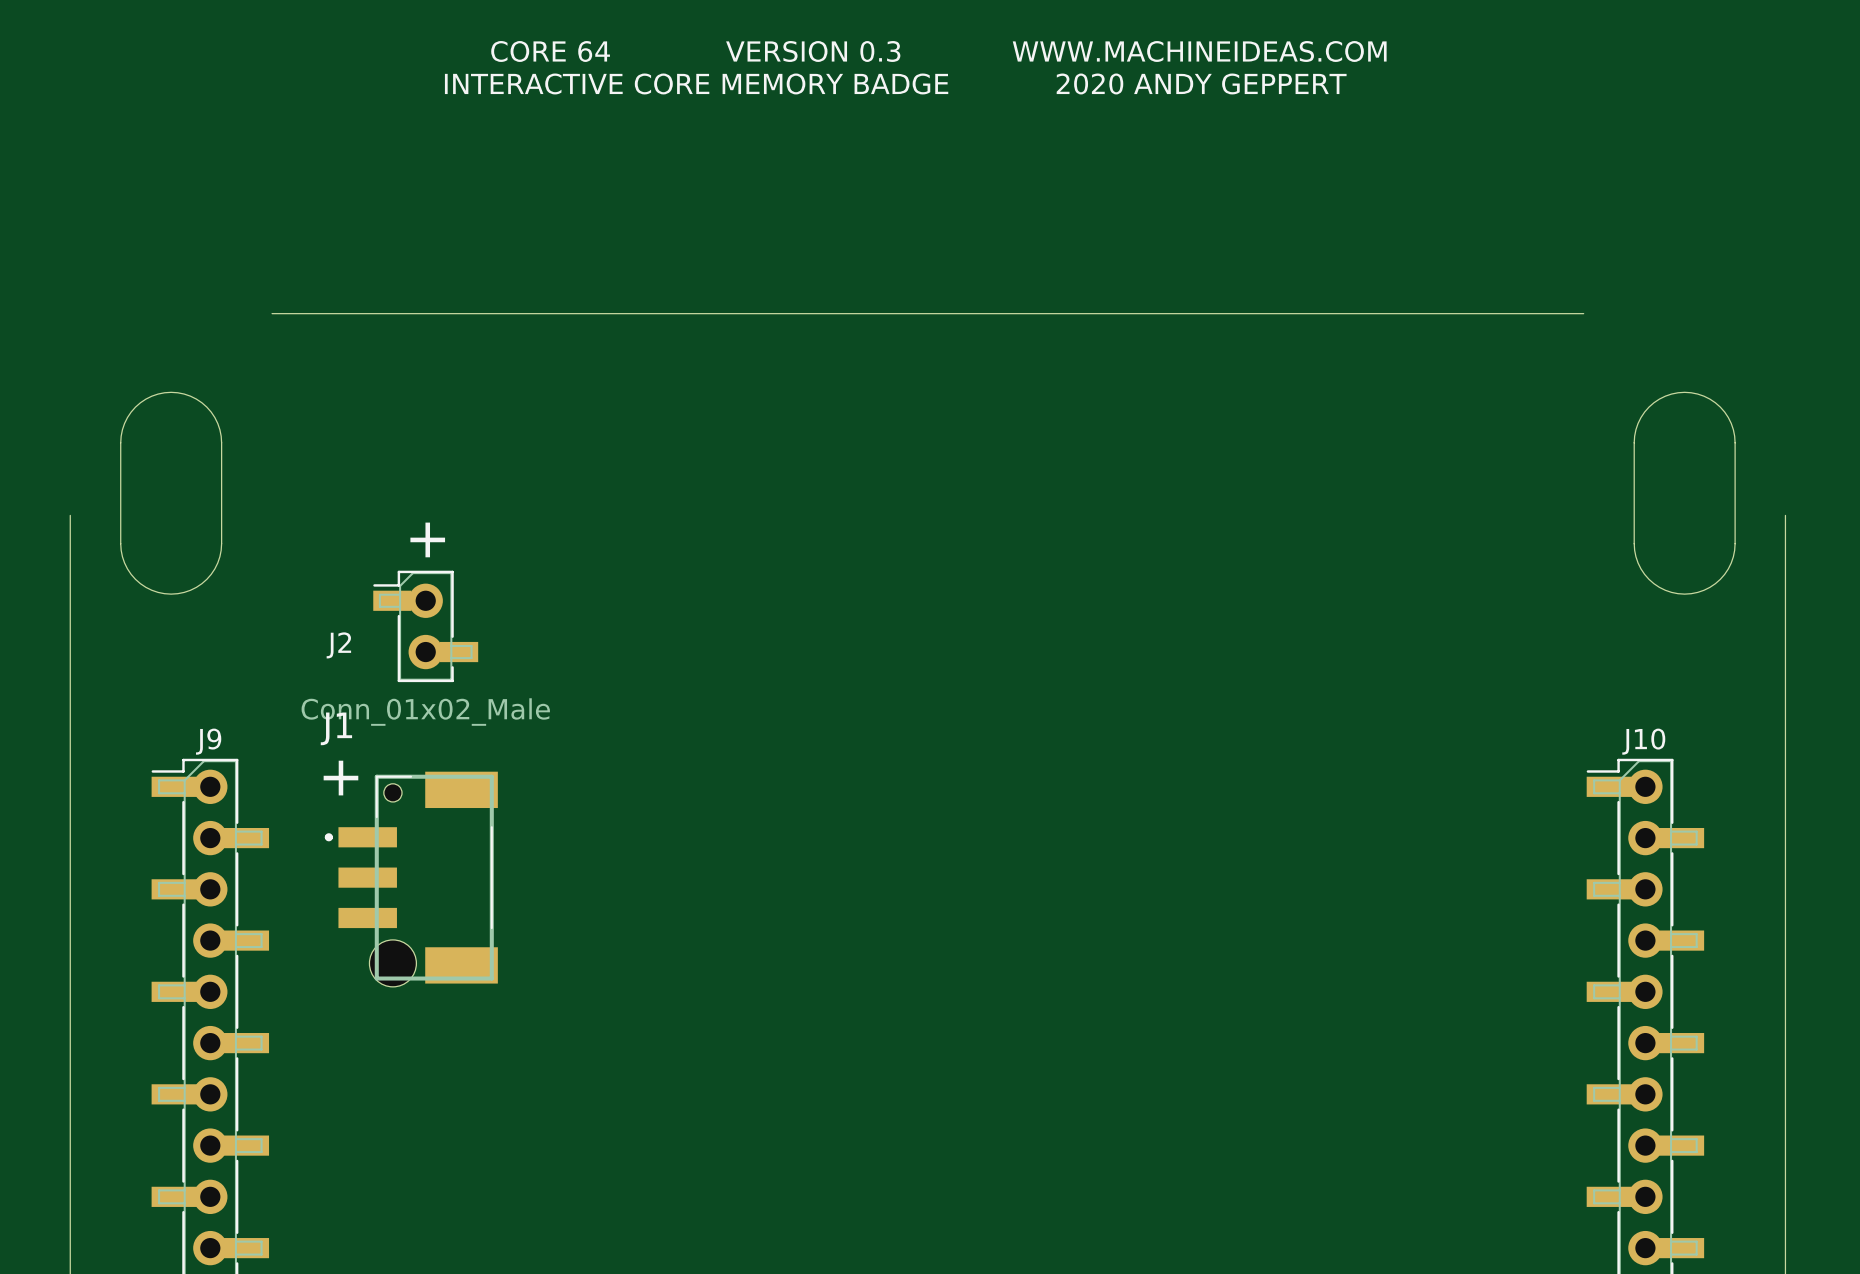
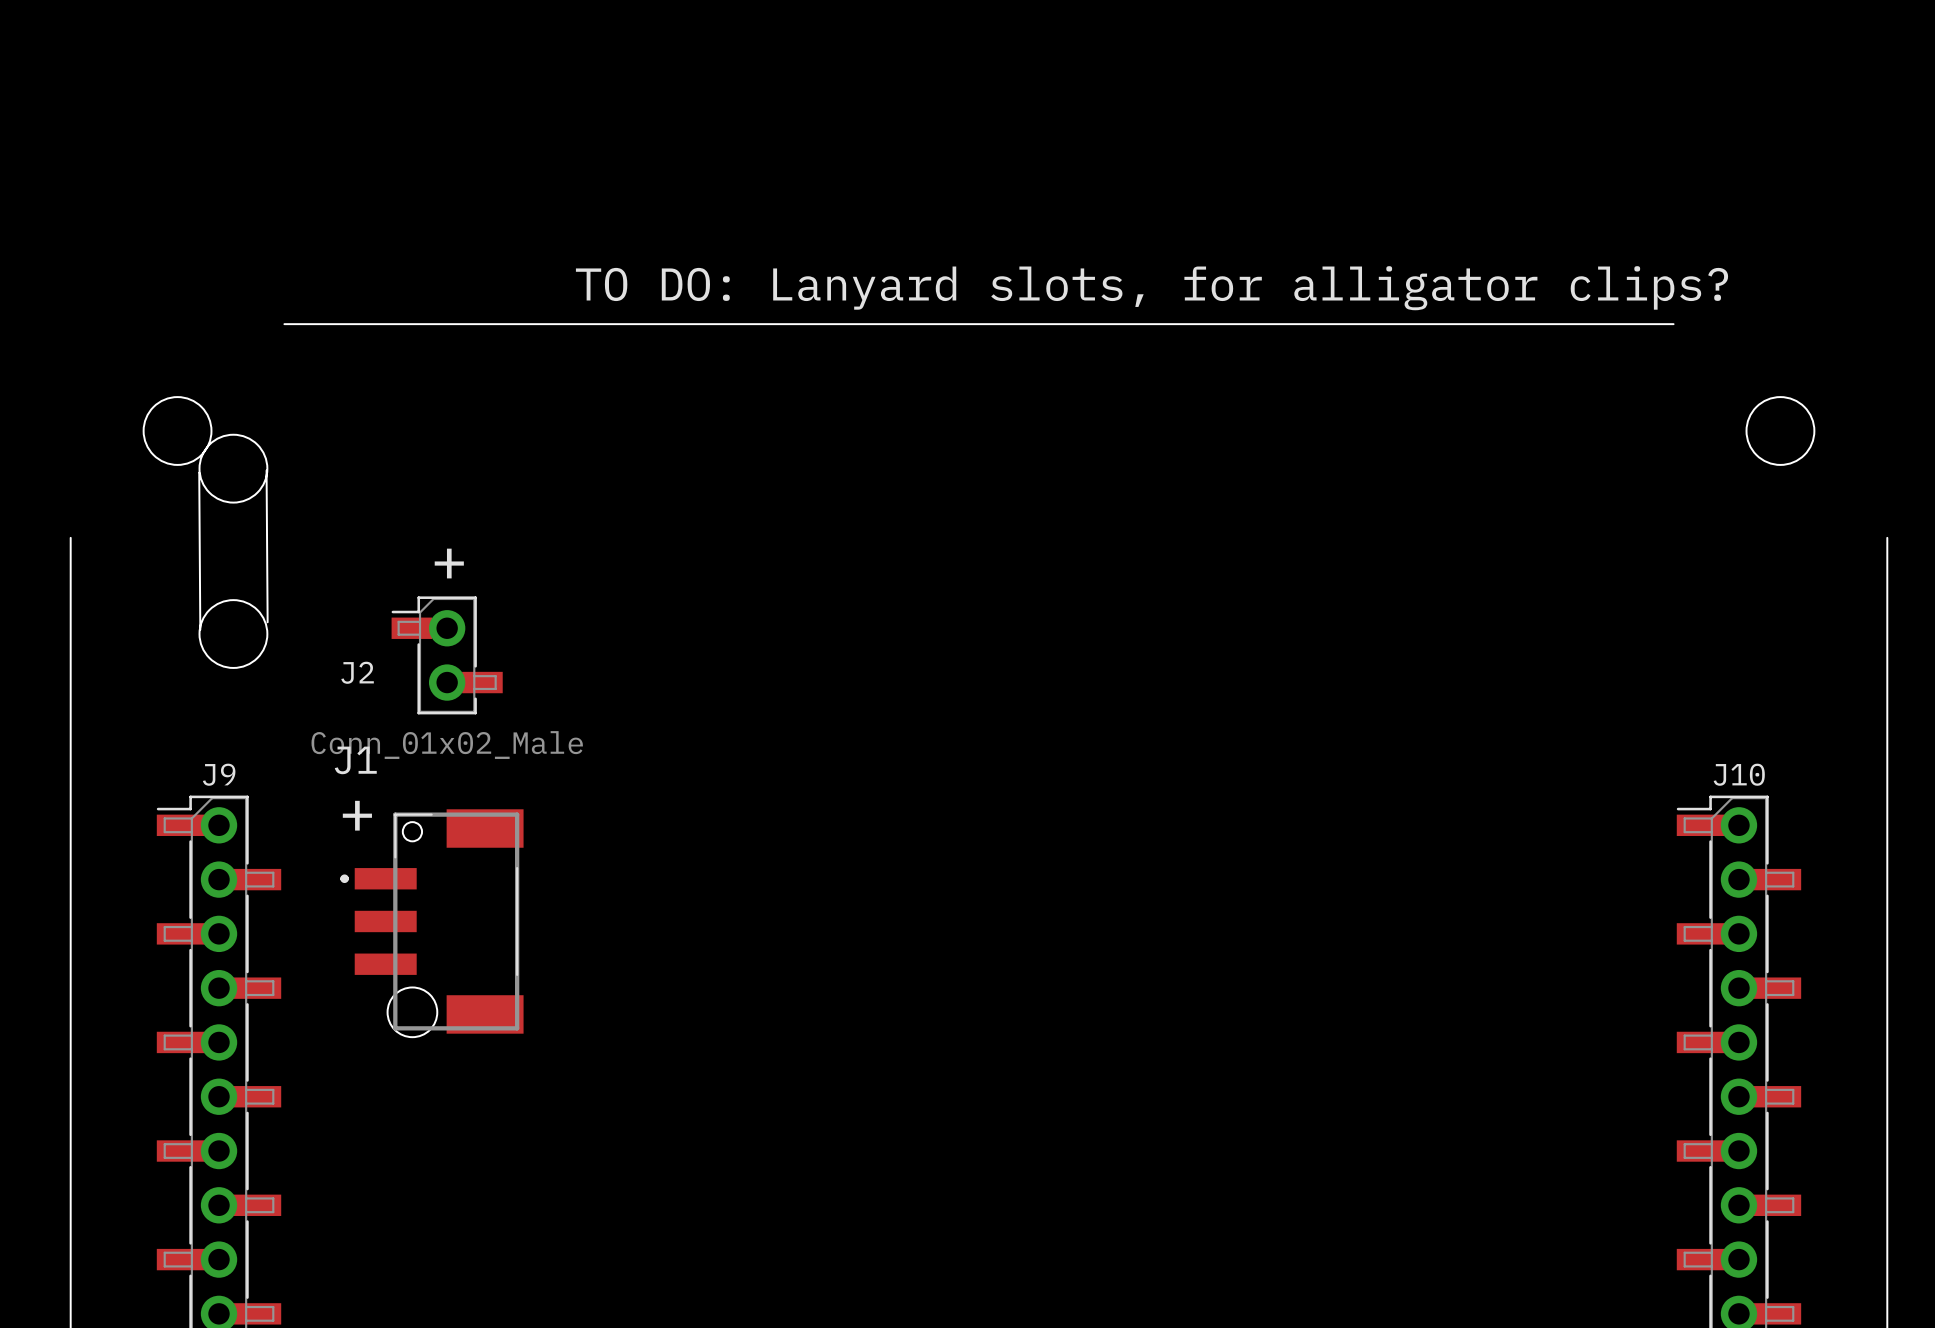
text: CORE 64 VERSION 0.3 (695, 51) -> none
text: WWW.MACHINEIDEAS.COM (1199, 51) -> none
text: INTERACTIVE CORE MEMORY BADGE (696, 83) -> none
text: 2020 ANDY GEPPERT (1201, 83) -> none
text: none -> TO DO: Lanyard slots, for alligator clips? (1152, 288)
round board edge: none -> [143, 396, 213, 466]
round board edge: none -> [1745, 396, 1815, 466]
round board edge: none -> [198, 434, 268, 504]
board edge: (120, 442) (120, 543) (122, 556) (127, 568) (140, 583) (158, 592) (177, 593) (196, 587) (206, 579) (214, 568) (221, 550) (221, 442) (219, 429) (214, 417) (201, 402) (190, 396) (171, 392) (158, 394) (145, 399) (131, 412) (122, 429) (120, 442) -> none
board edge: (1634, 442) (1634, 543) (1635, 556) (1640, 568) (1653, 583) (1671, 592) (1691, 593) (1709, 587) (1720, 579) (1728, 568) (1734, 550) (1735, 442) (1733, 429) (1728, 417) (1715, 402) (1703, 396) (1684, 392) (1671, 394) (1659, 399) (1644, 412) (1635, 429) (1634, 442) -> none
board edge: none -> (266, 470) (267, 622)
board edge: none -> (199, 472) (200, 629)
round board edge: none -> [198, 599, 268, 669]

